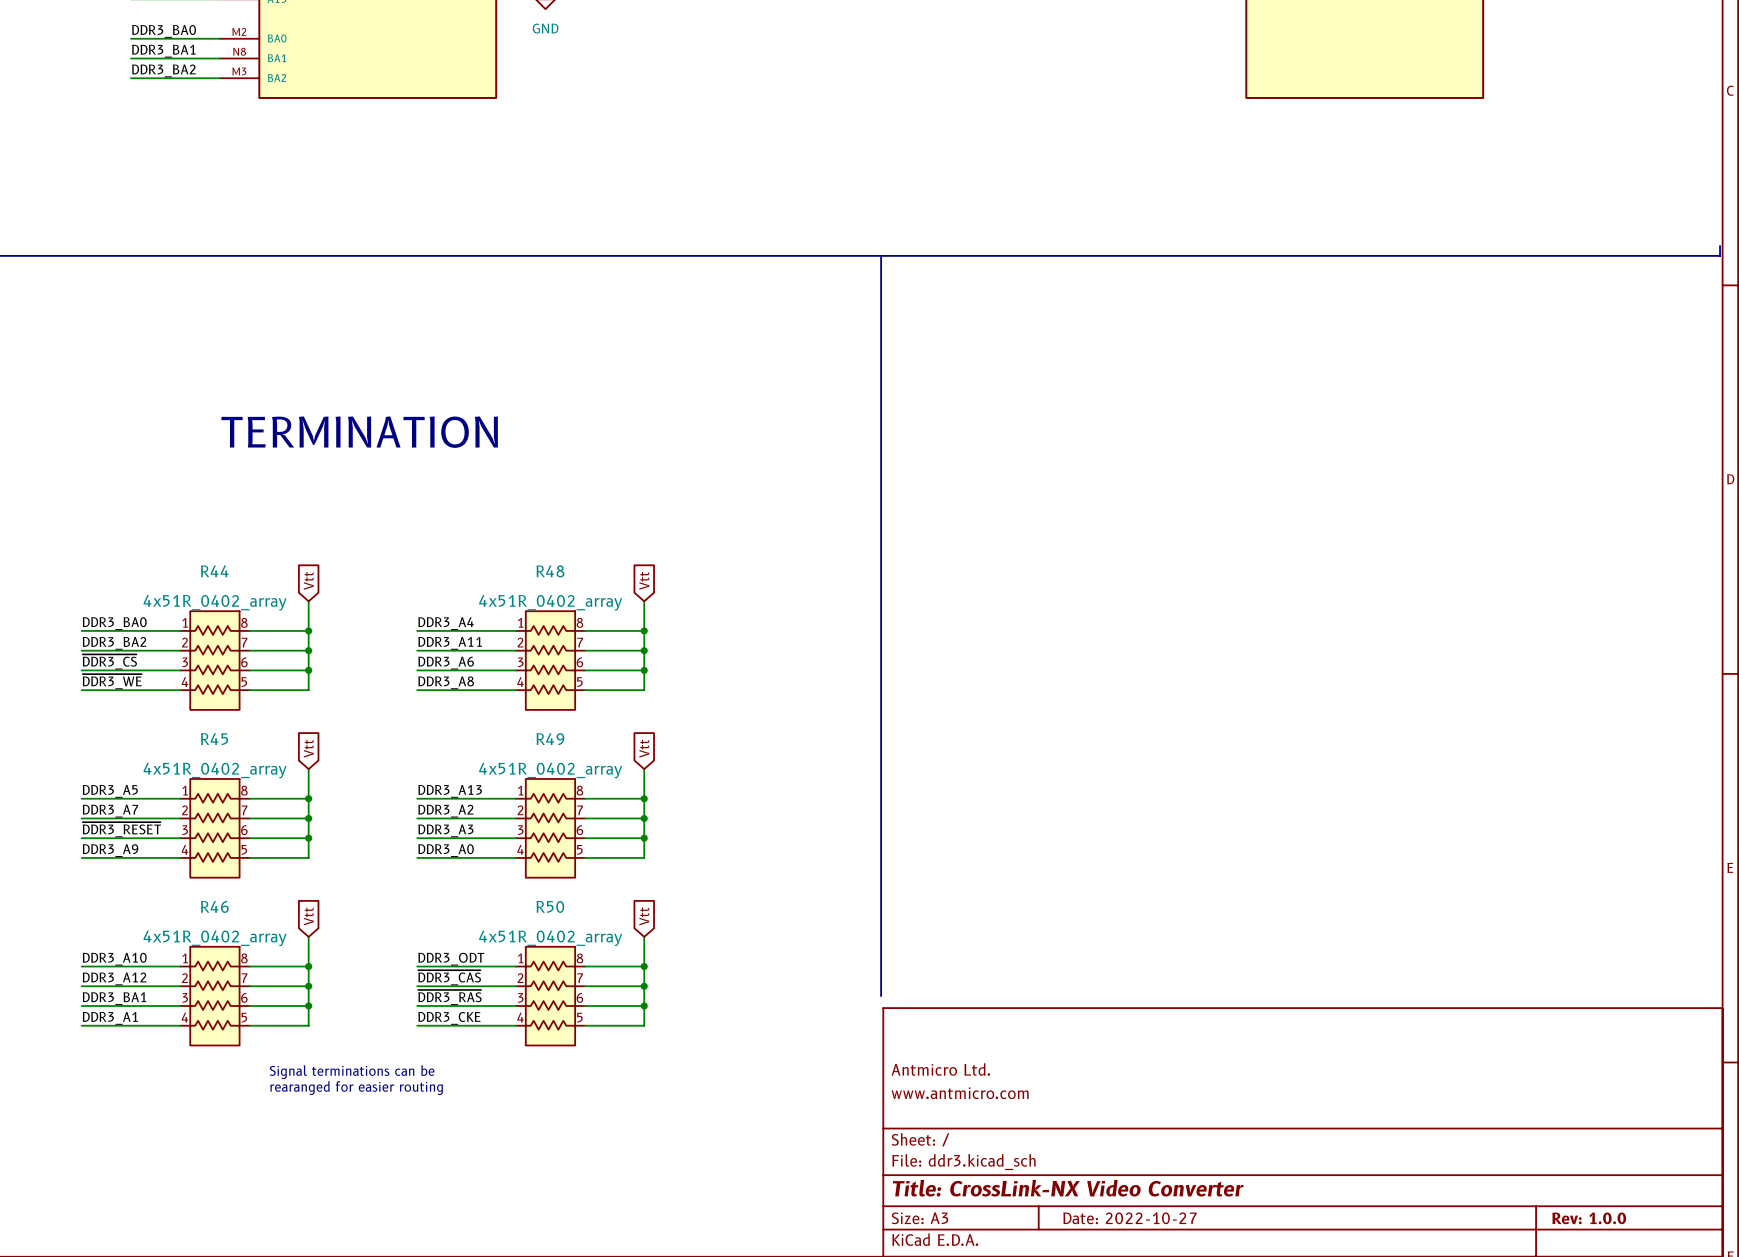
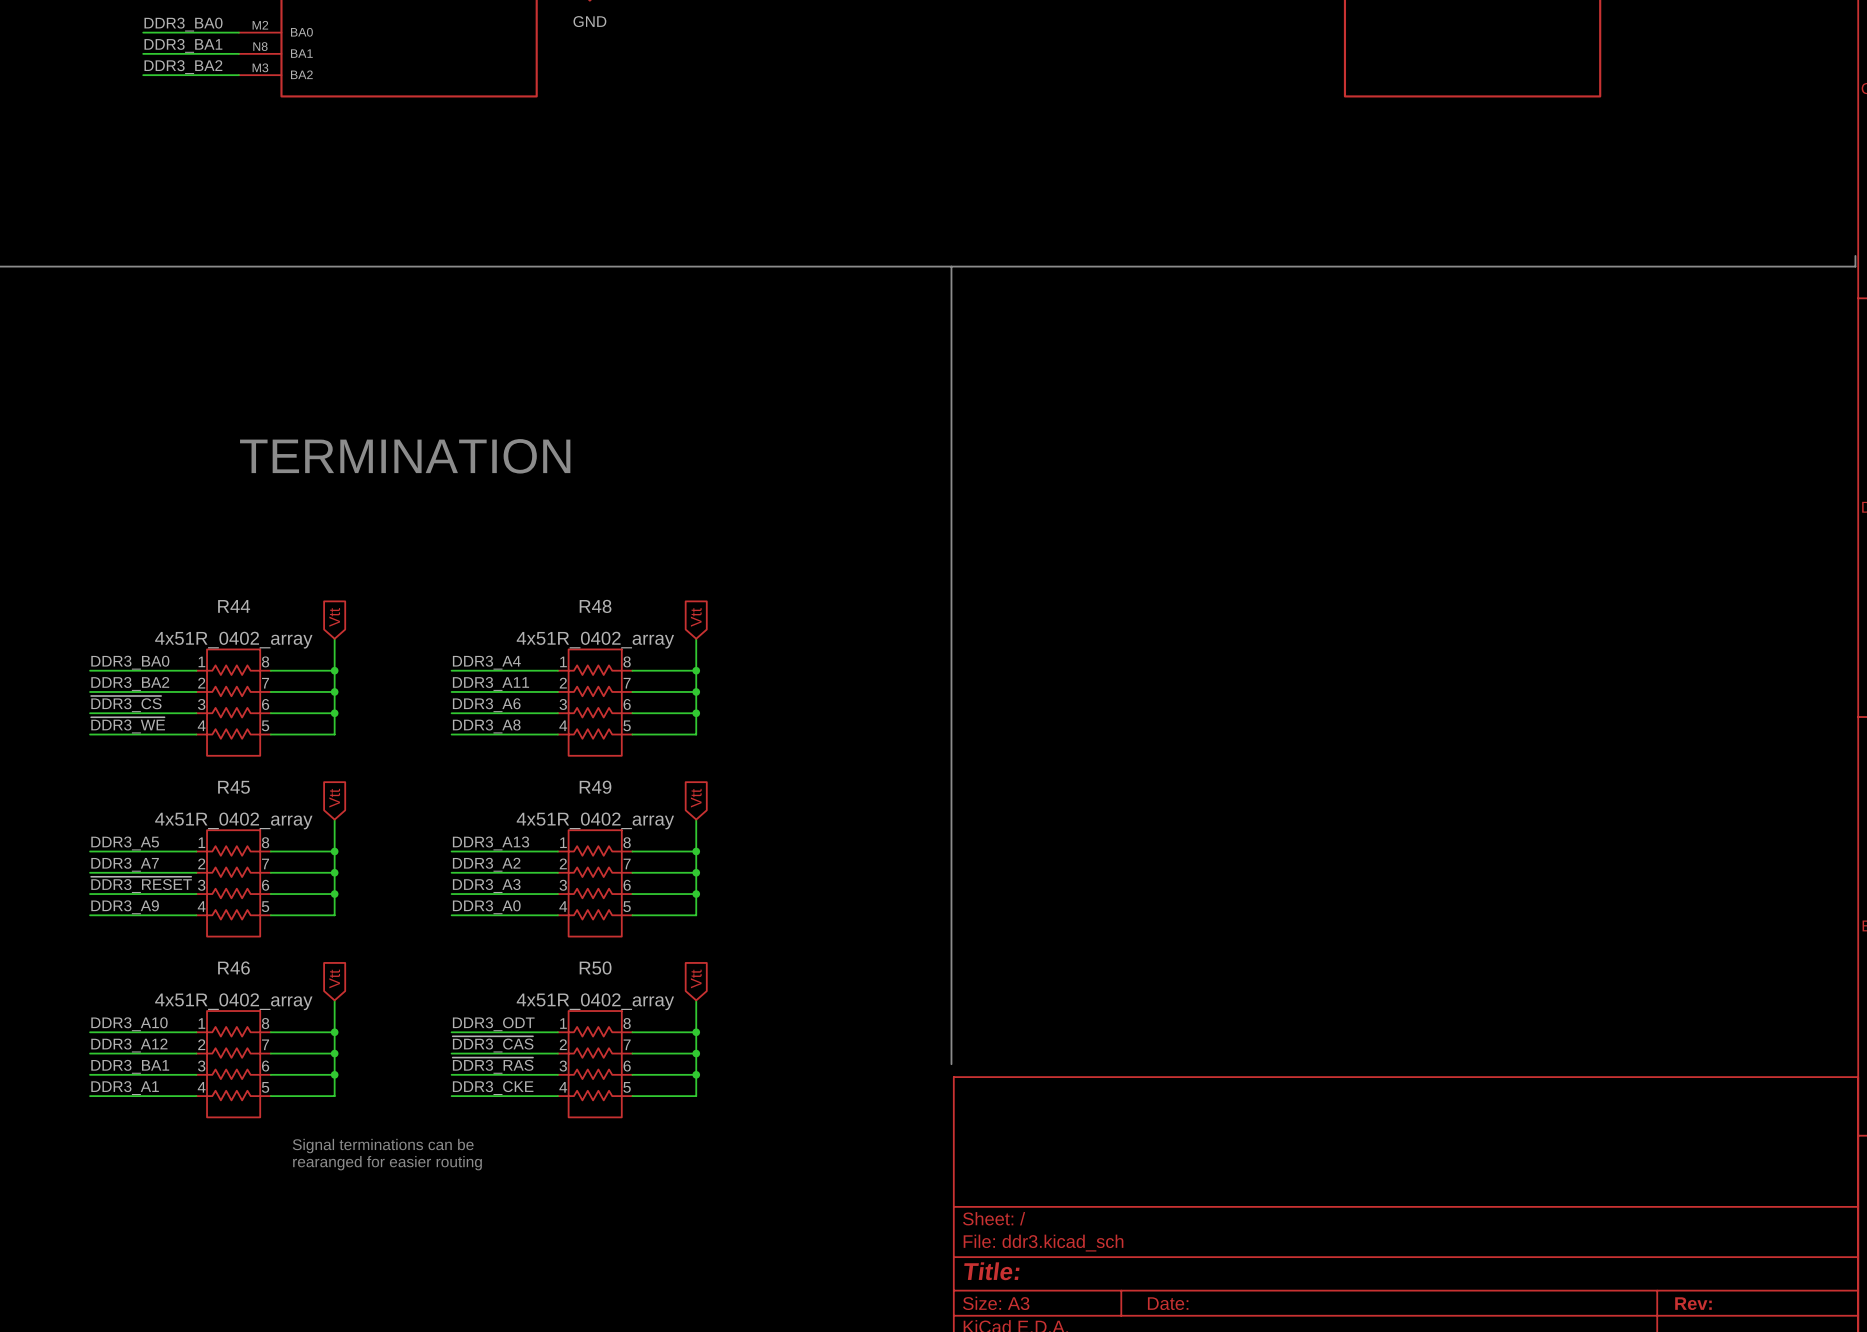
title block: Antmicro Ltd. (940, 1069) -> none
title block: www.antmicro.com (960, 1093) -> none
title block: Title: CrossLink-NX Video Converter (1068, 1188) -> Title: (991, 1271)
title block: Date: 2022-10-27 (1129, 1218) -> Date: (1168, 1303)
title block: Rev: 1.0.0 (1589, 1218) -> Rev: (1693, 1303)

